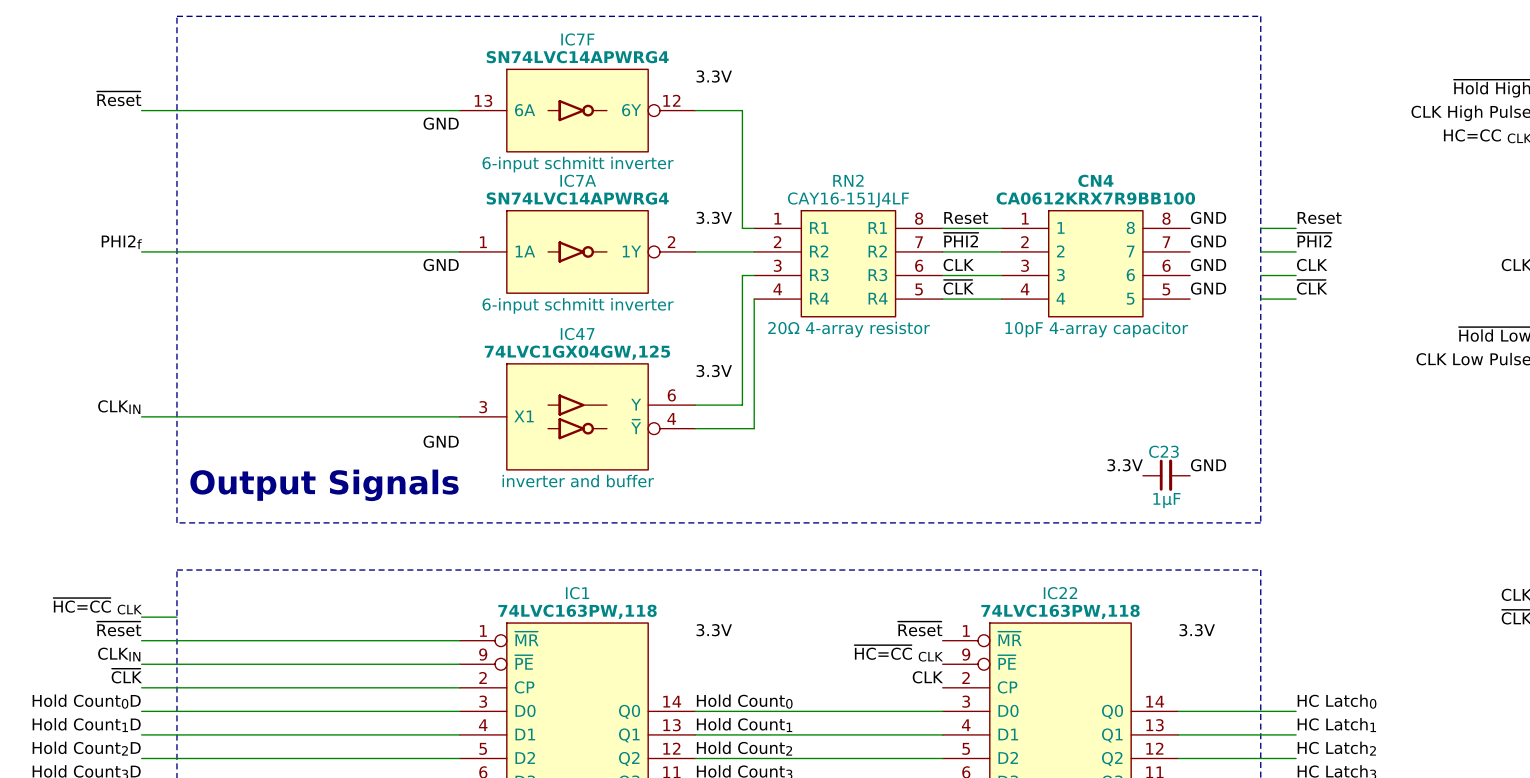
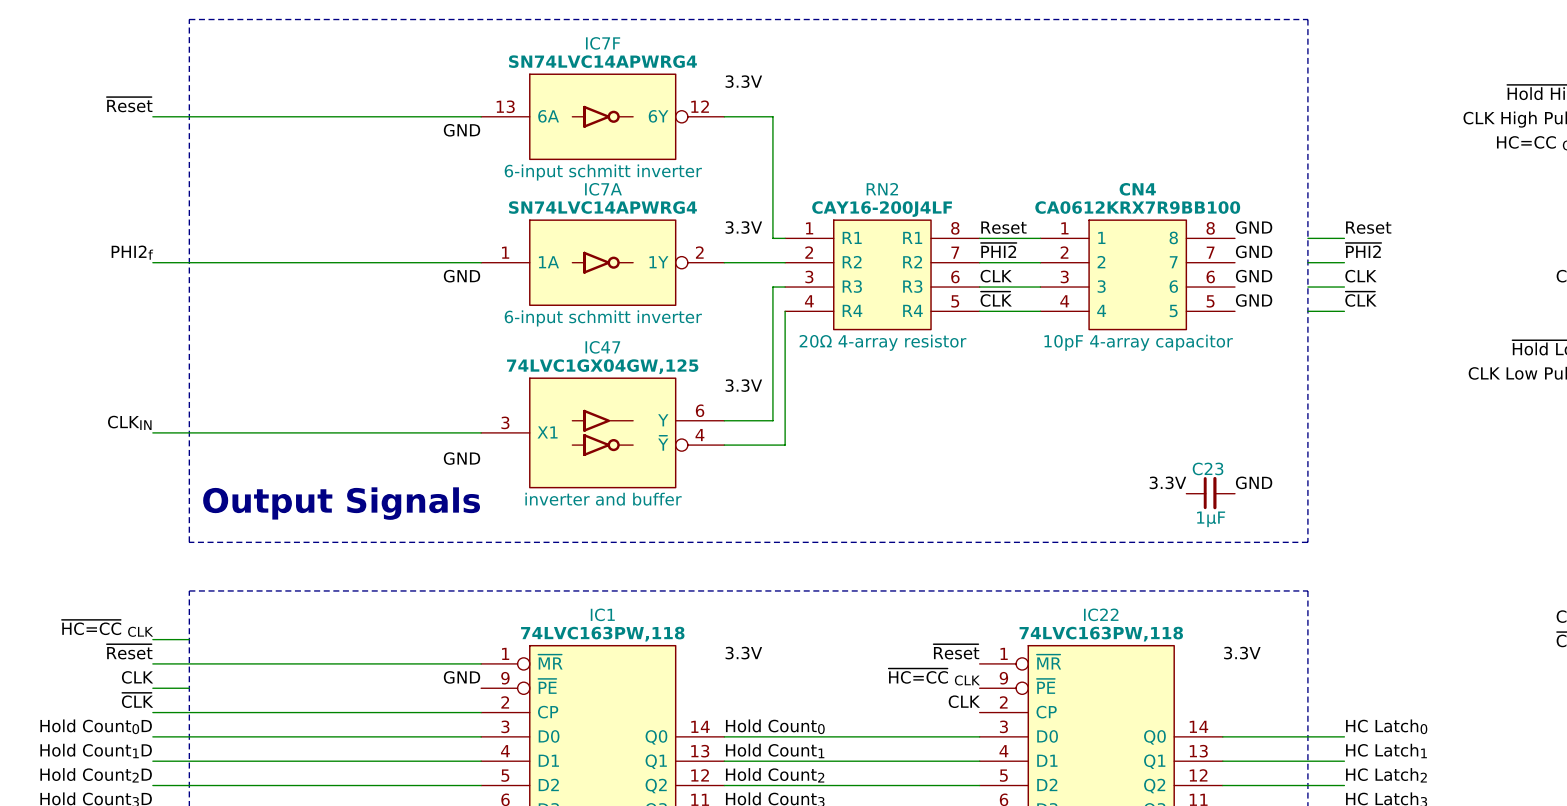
RN2 value: CAY16-151J4LF (848, 200) -> CAY16-200J4LF (882, 209)
label: none -> GND (462, 677)
label: CLKIN (119, 654) -> CLK (137, 677)
wire: (176, 664) (459, 664) -> none

